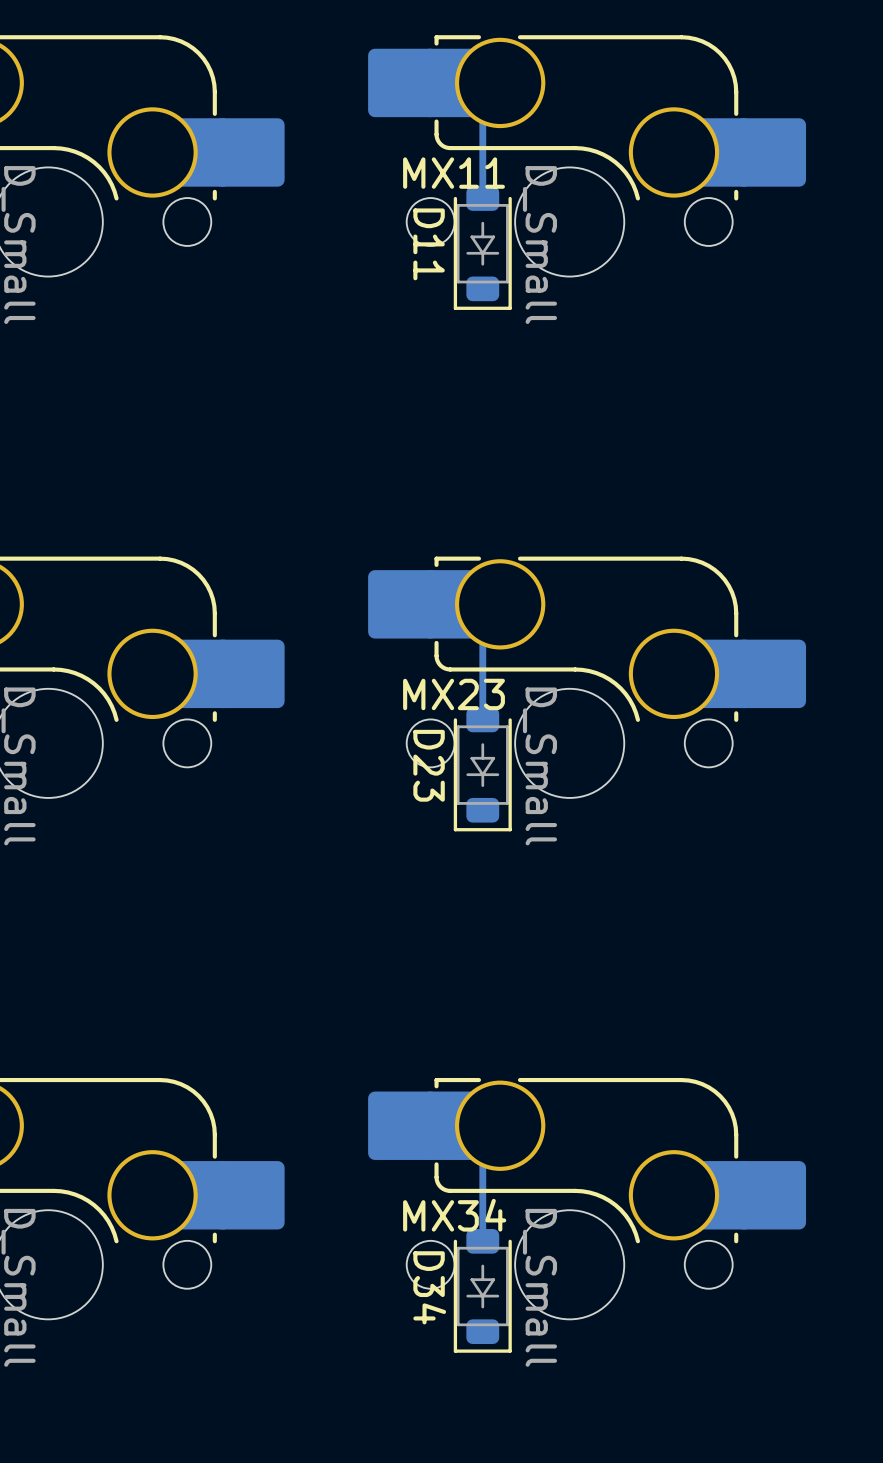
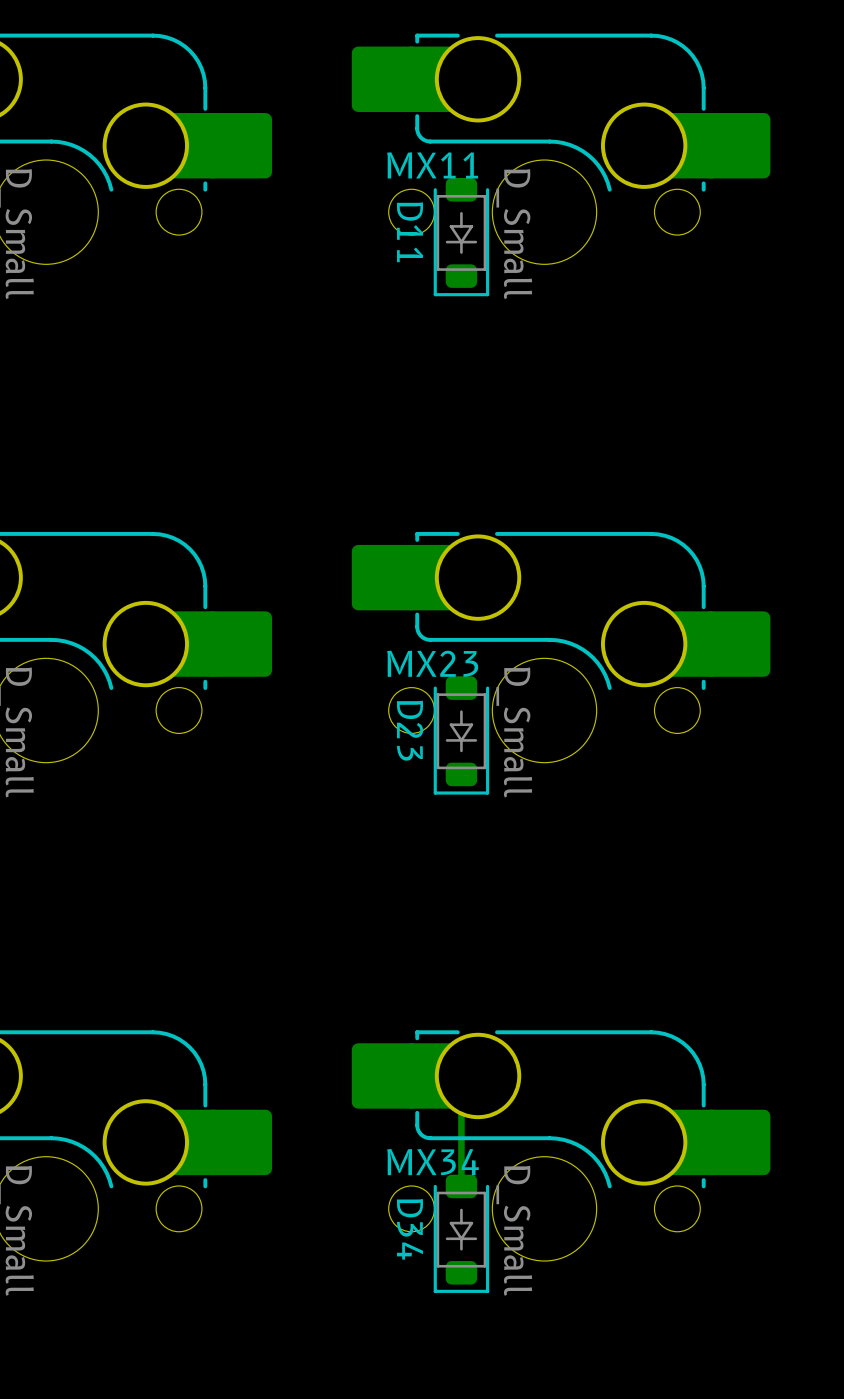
track: (500, 82) (482, 100) (482, 198) -> none
track: (500, 604) (482, 621) (482, 719) -> none

